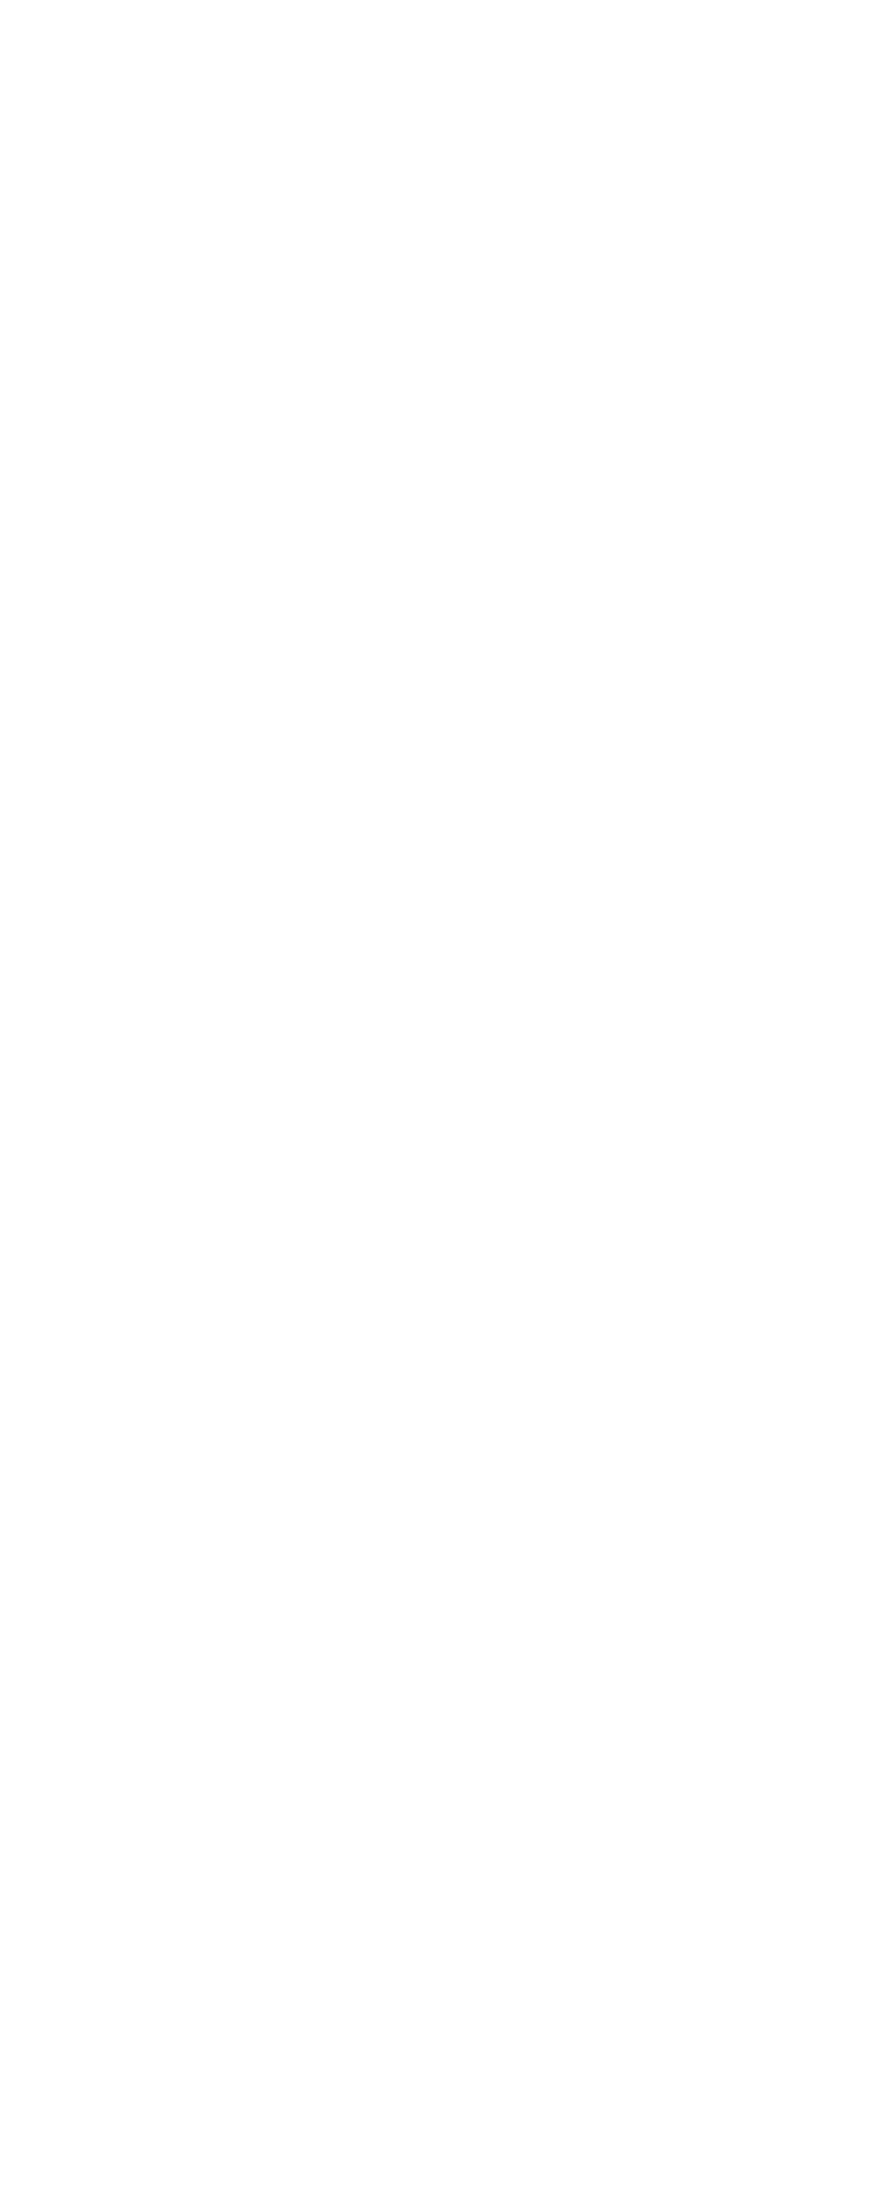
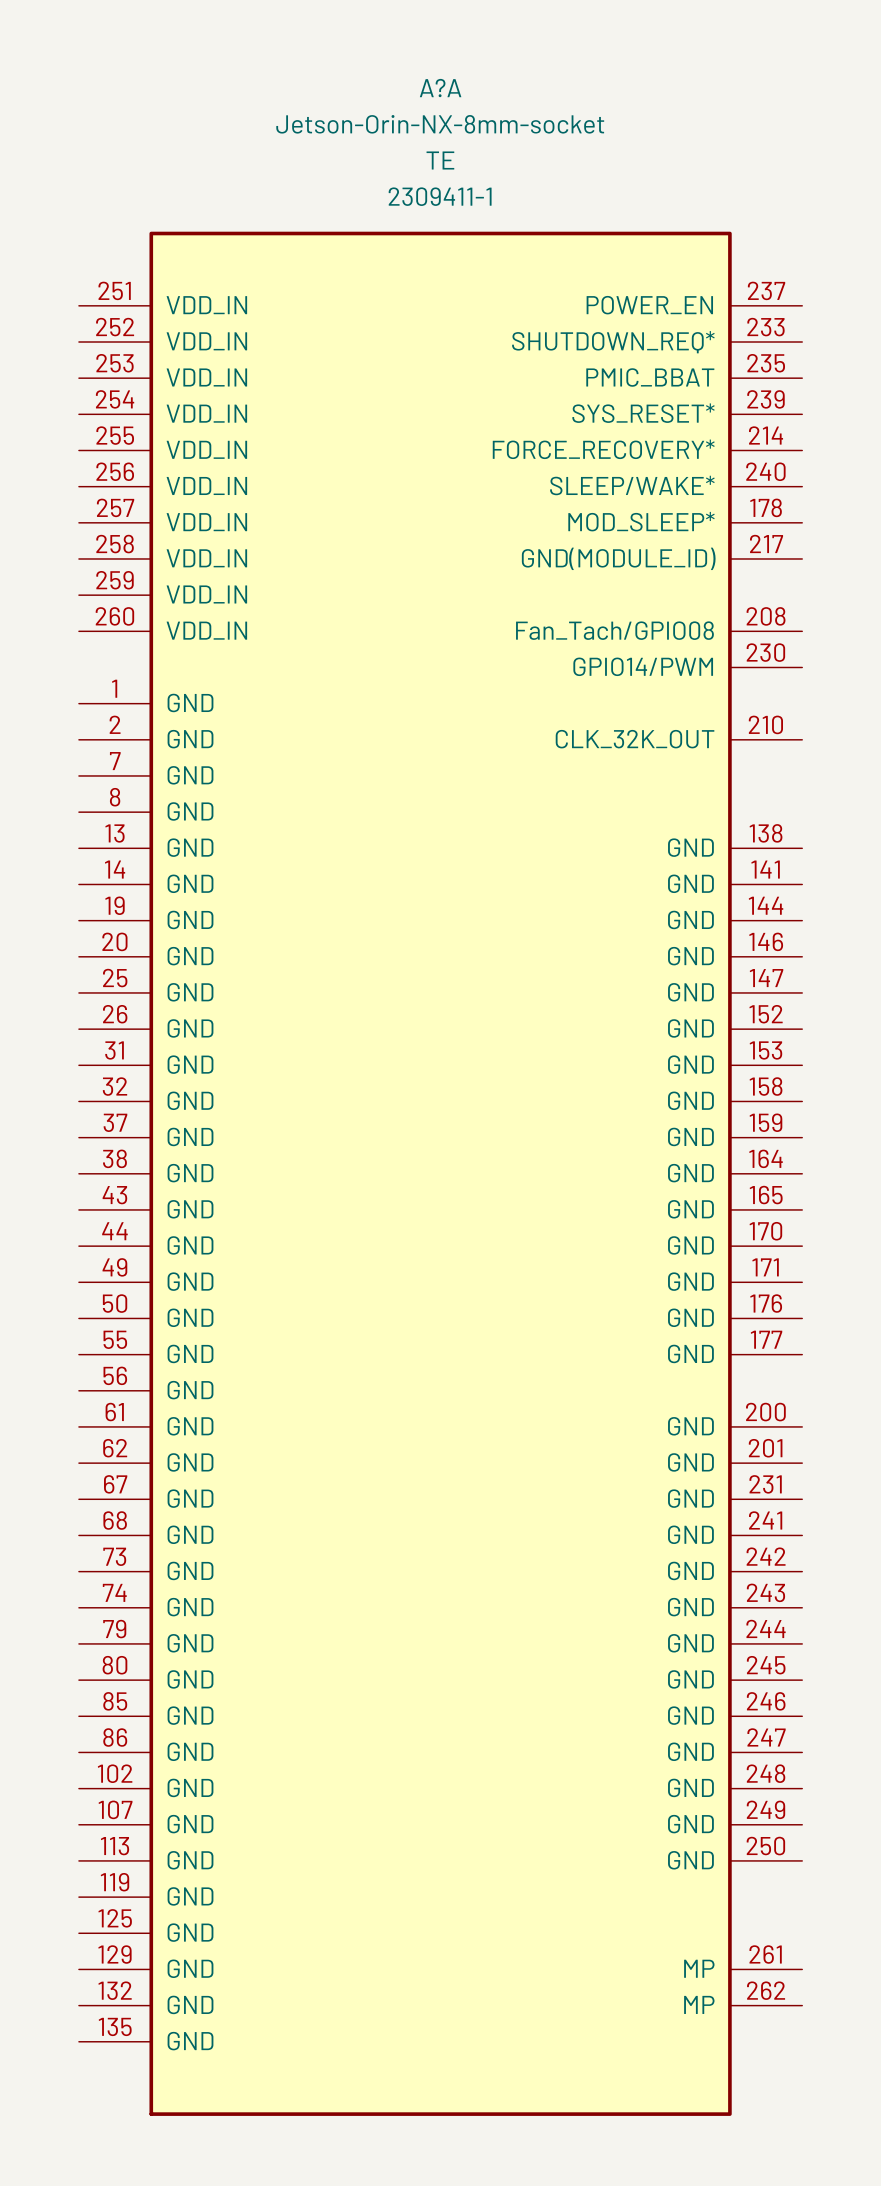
A?A: none -> Jetson-Orin-NX-8mm-socket (440, 1173)

